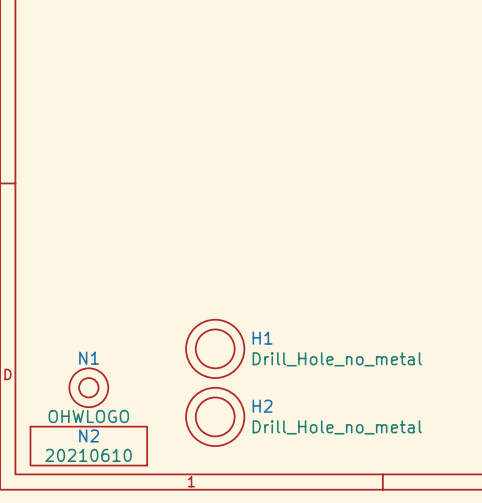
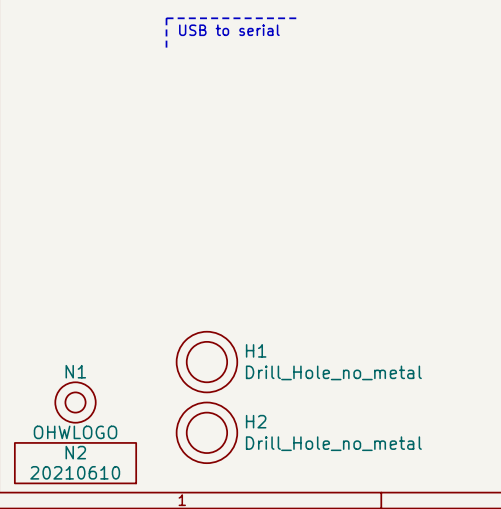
line: none -> (297, 18) (166, 18) (166, 48)
text: none -> USB to serial (229, 30)

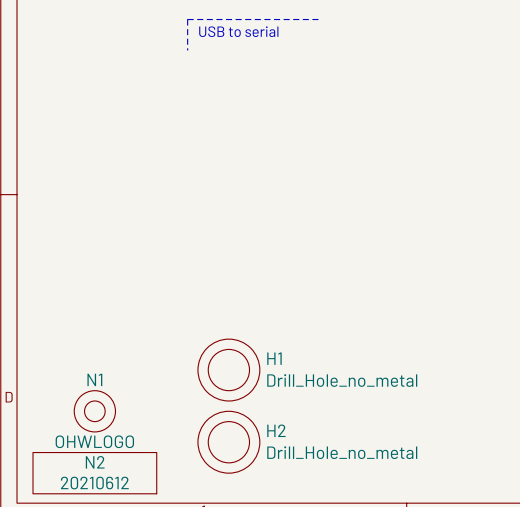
N2 value: 20210610 (75, 472) -> 20210612 (94, 483)

